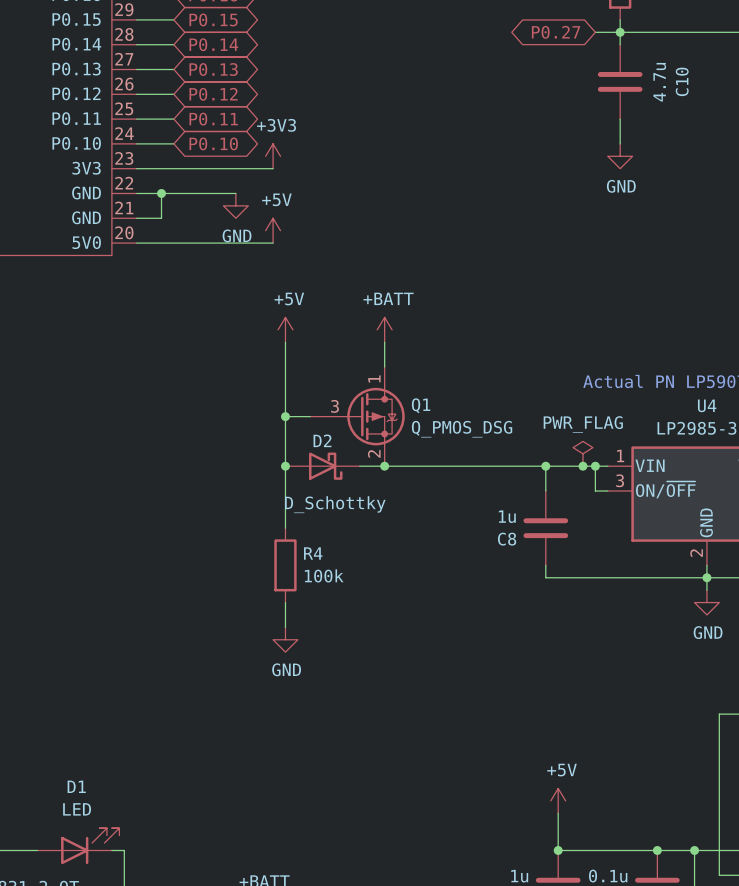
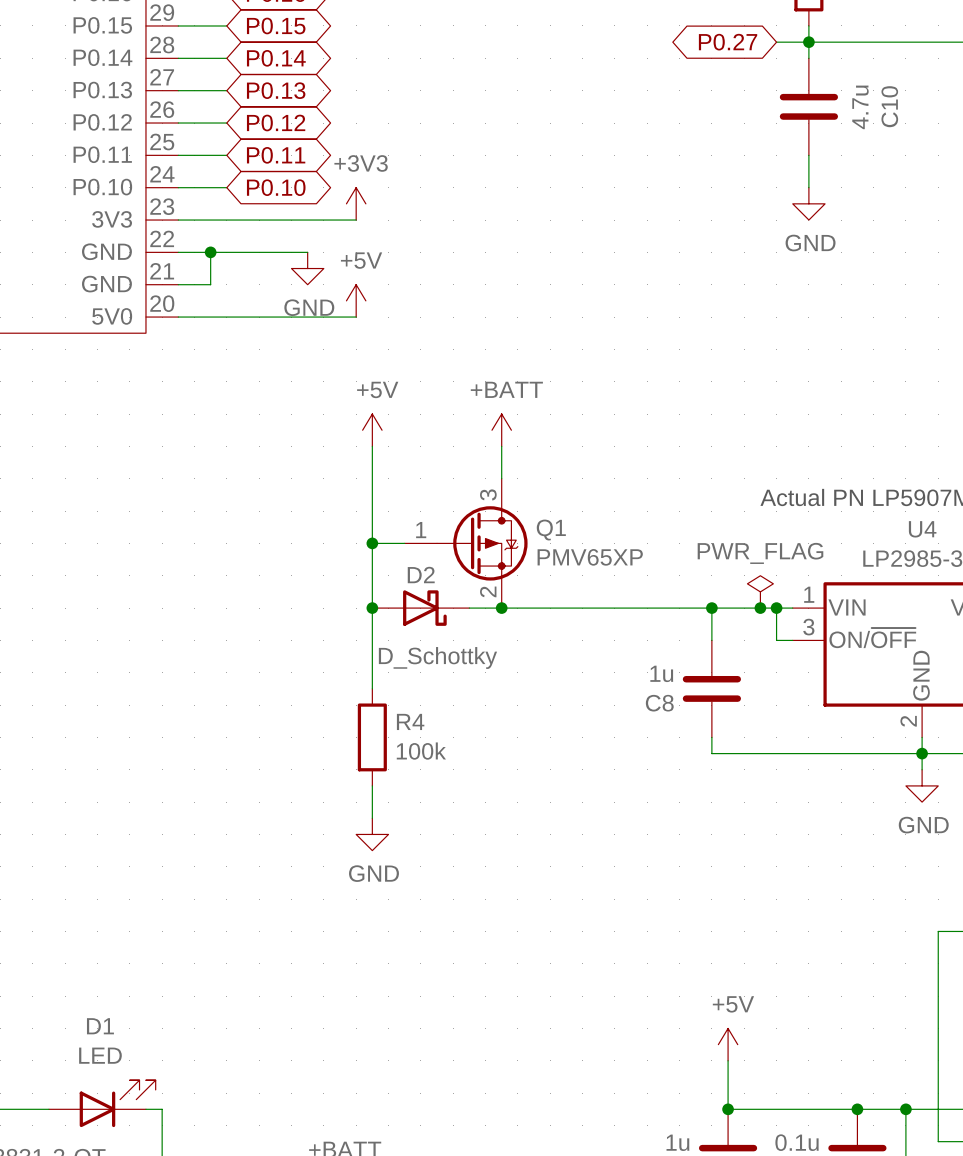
Q1 symbol: [310, 367, 405, 467] -> [404, 478, 528, 609]
Q1 value: Q_PMOS_DSG (462, 429) -> PMV65XP (590, 557)

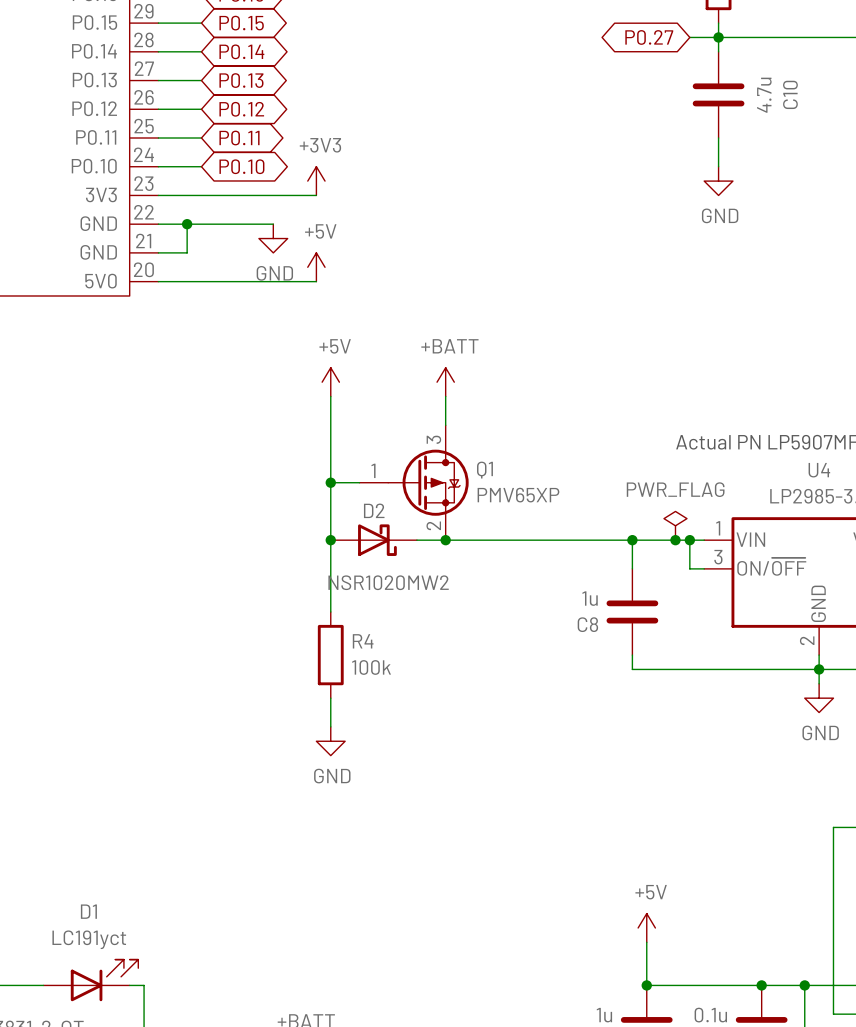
D2 value: D_Schottky (437, 657) -> NSR1020MW2 (388, 582)
D1 value: LED (100, 1055) -> LC191yct (89, 939)

